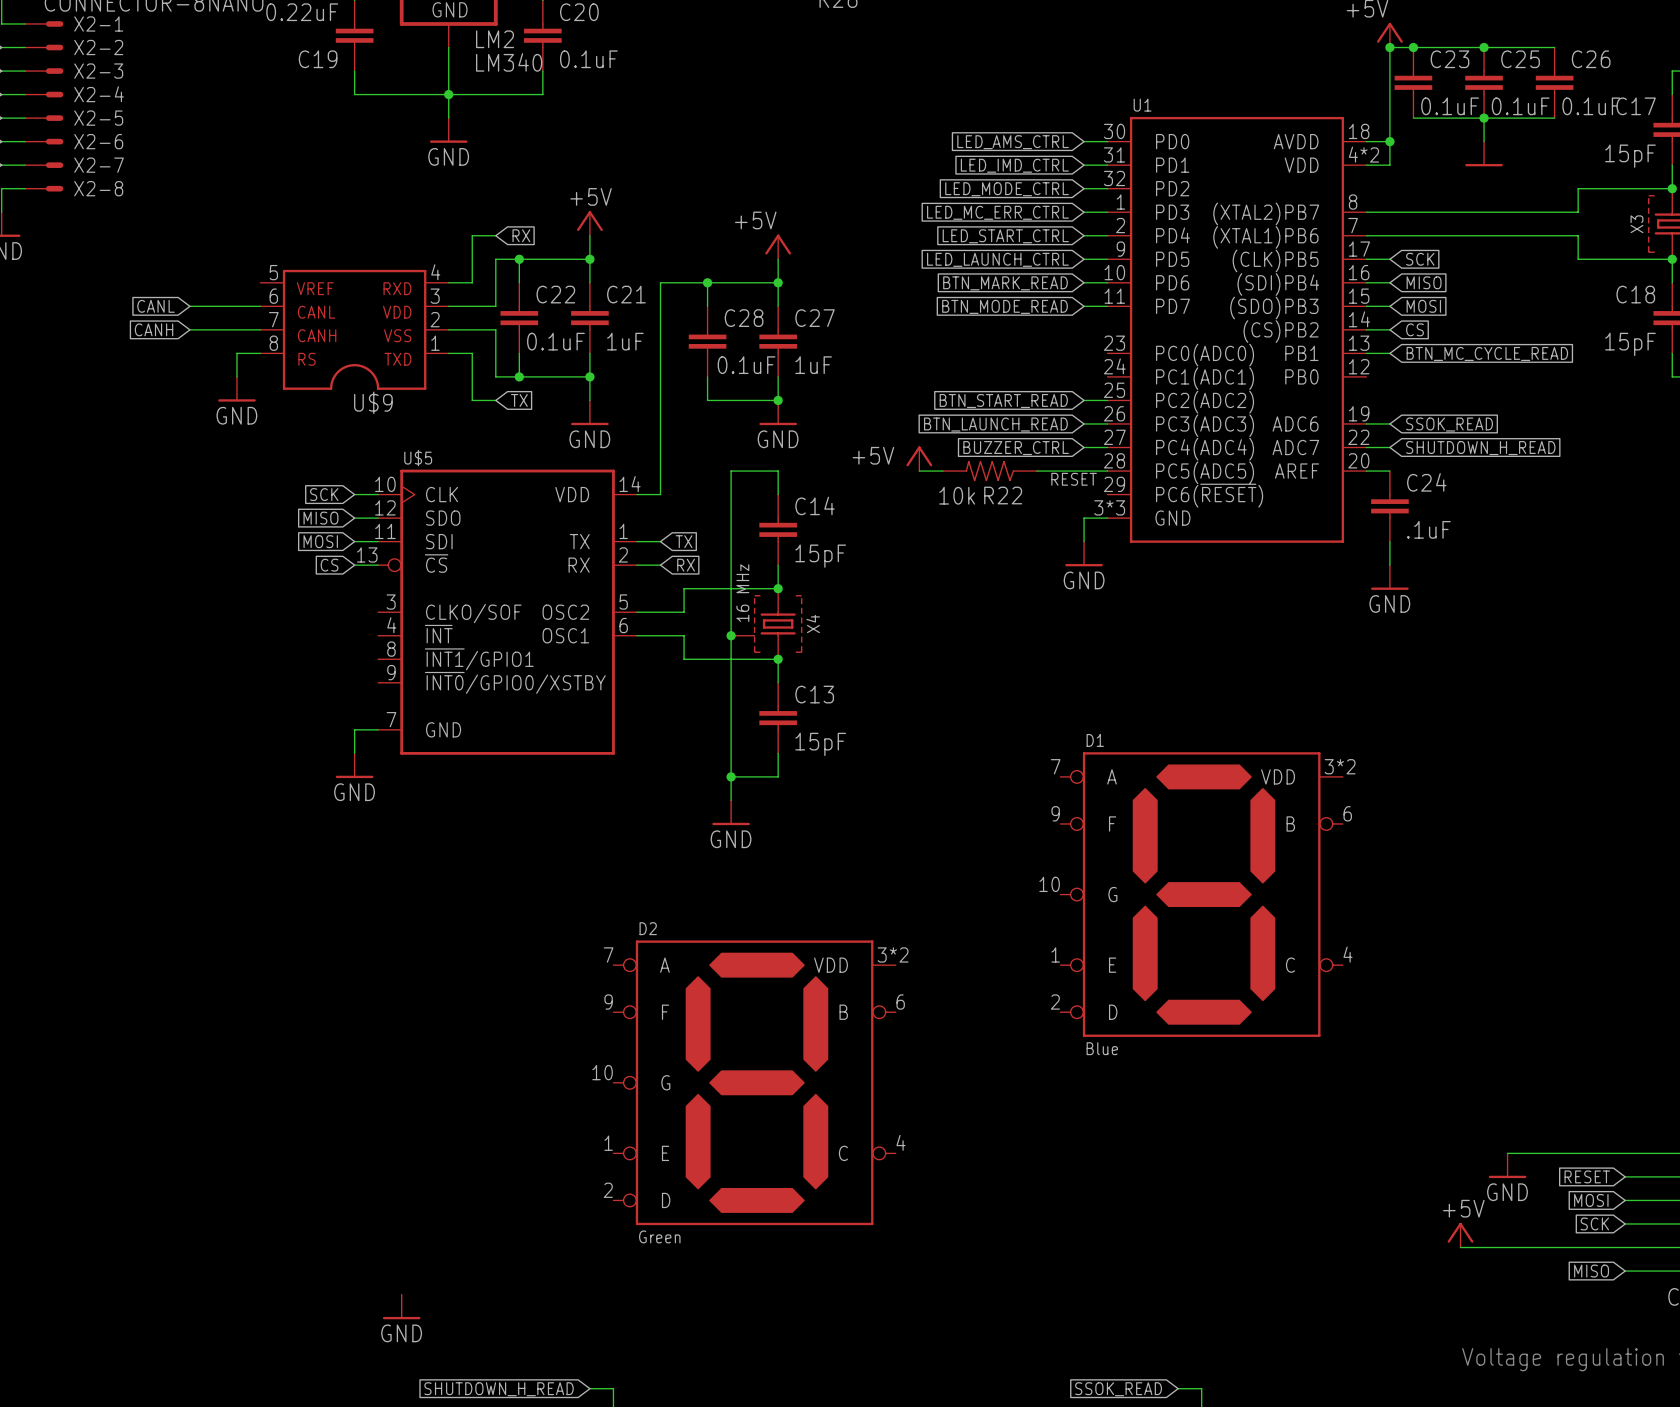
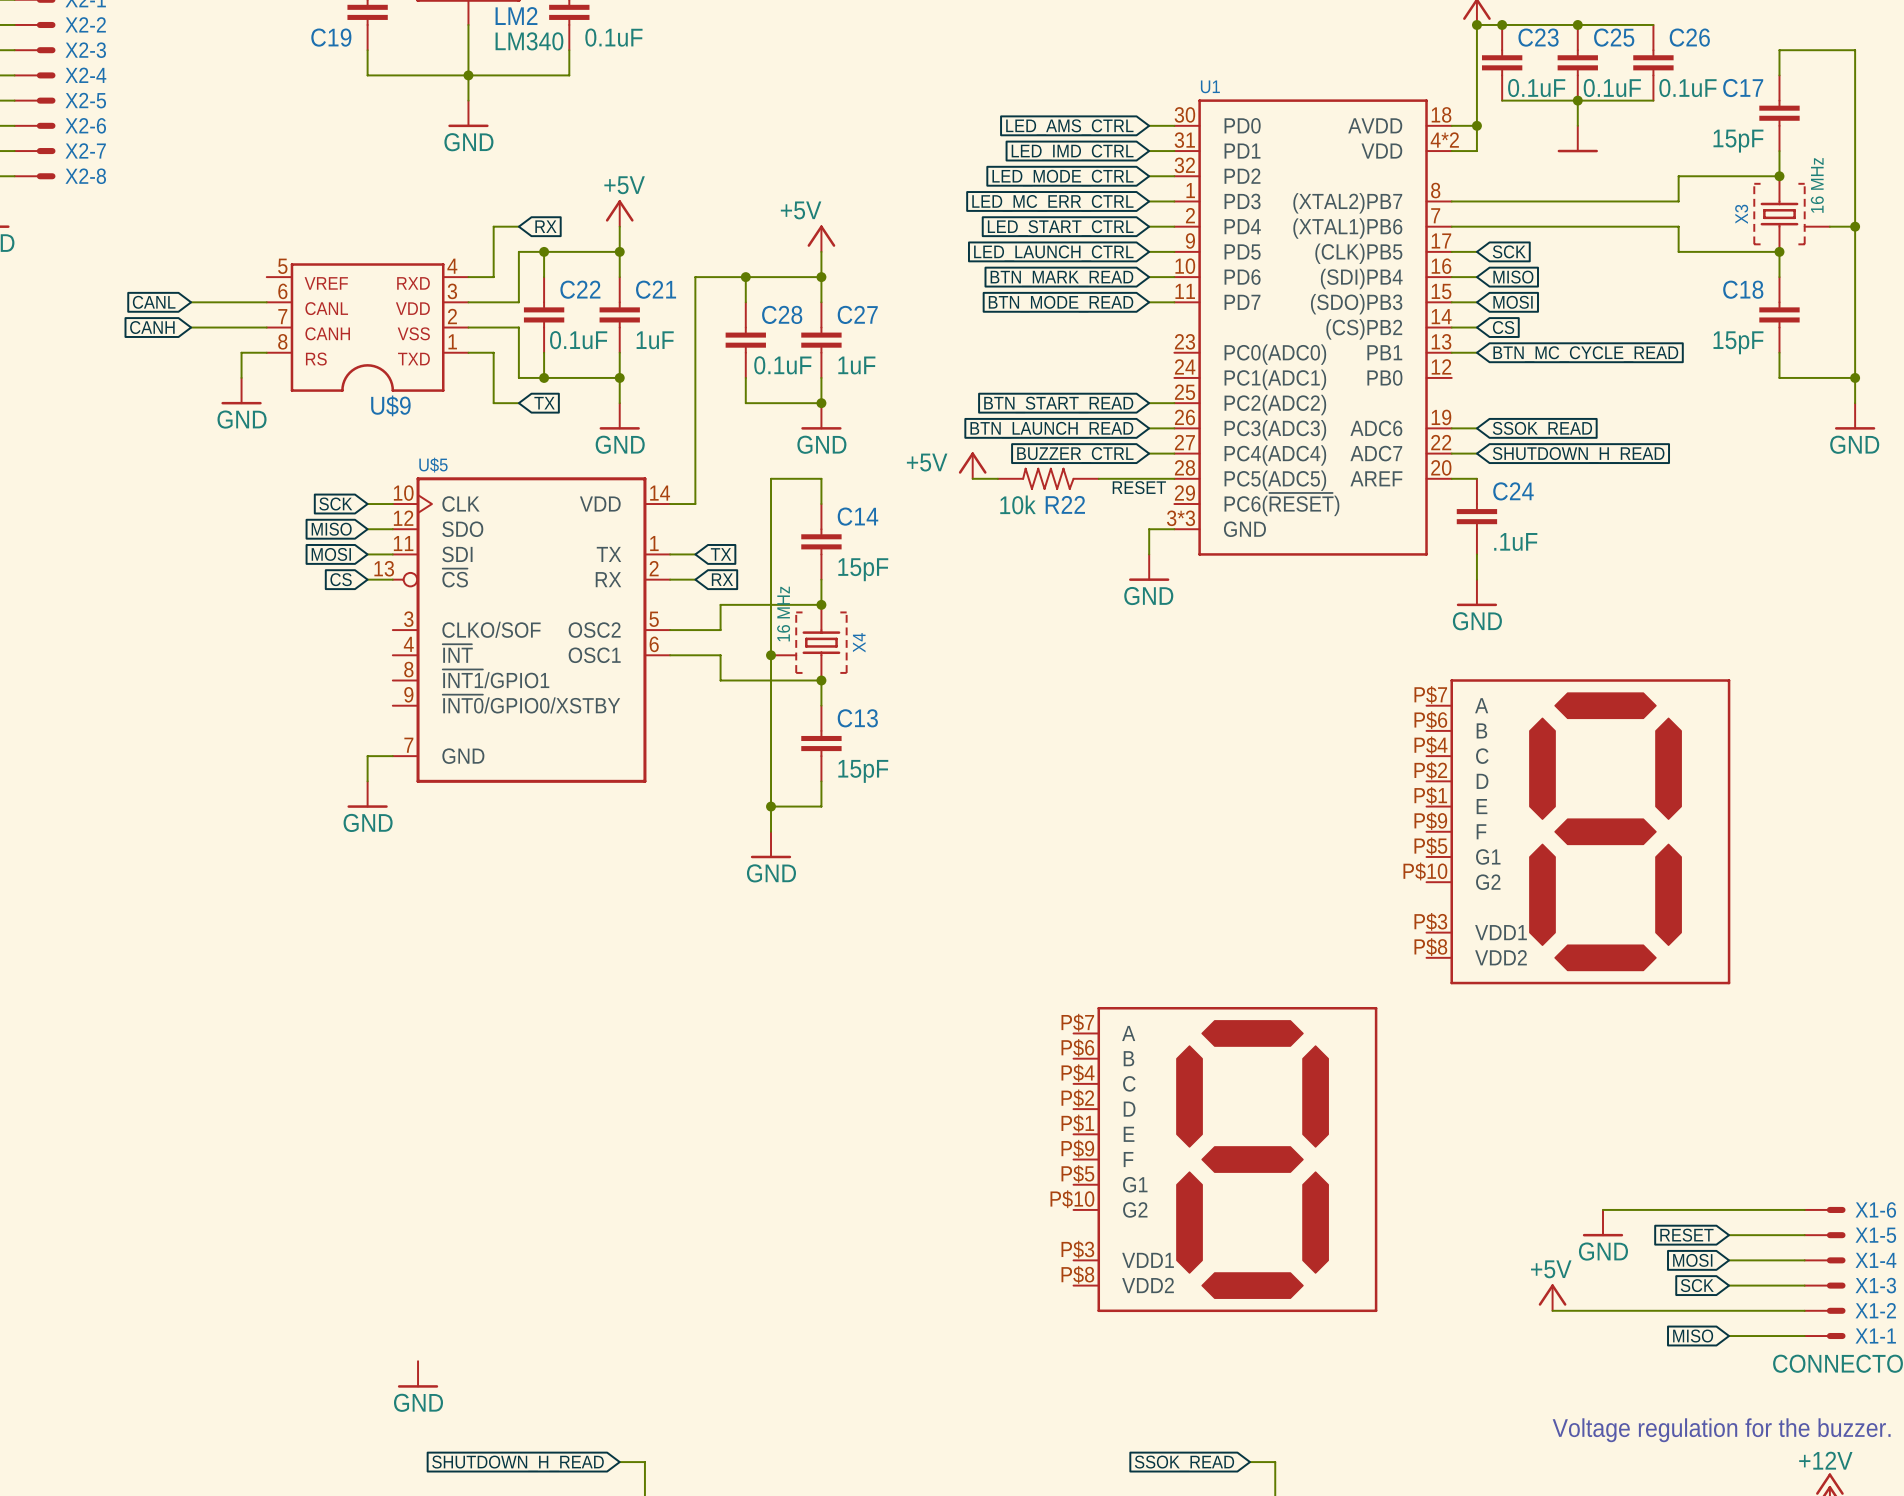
part: none -> (1578, 831)
D1: (1201, 894) -> none
D2: (754, 1082) -> none
part: none -> (1225, 1159)

